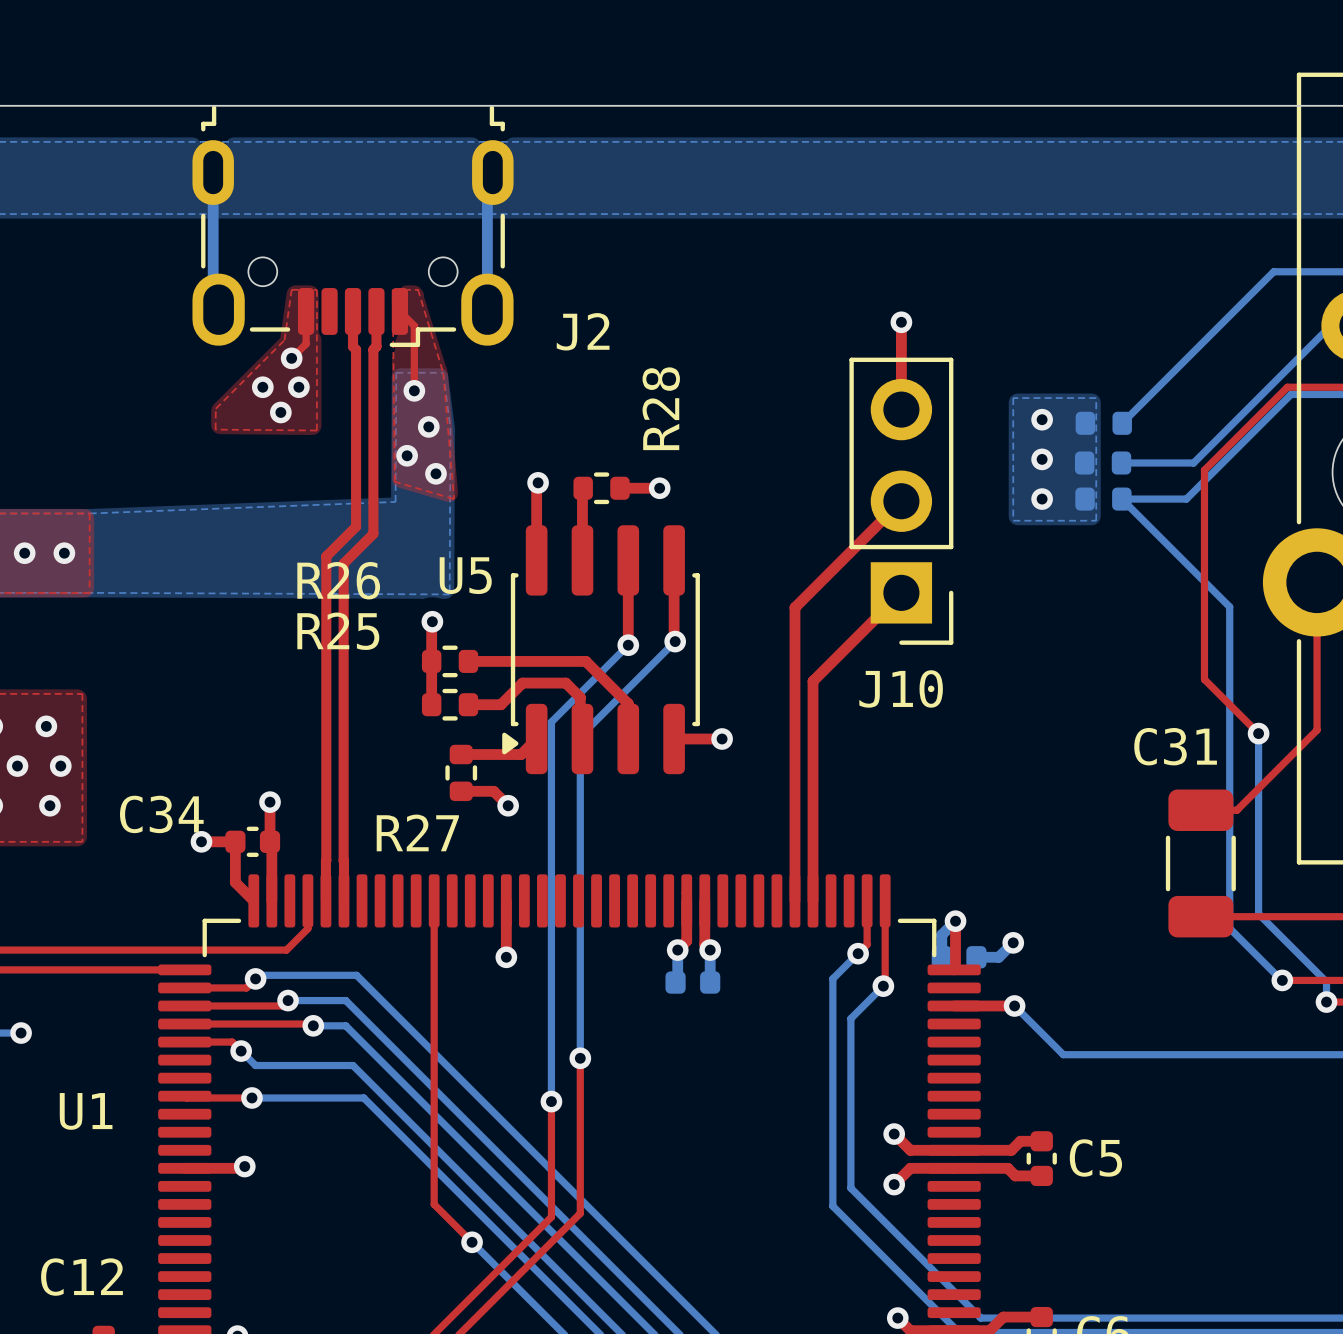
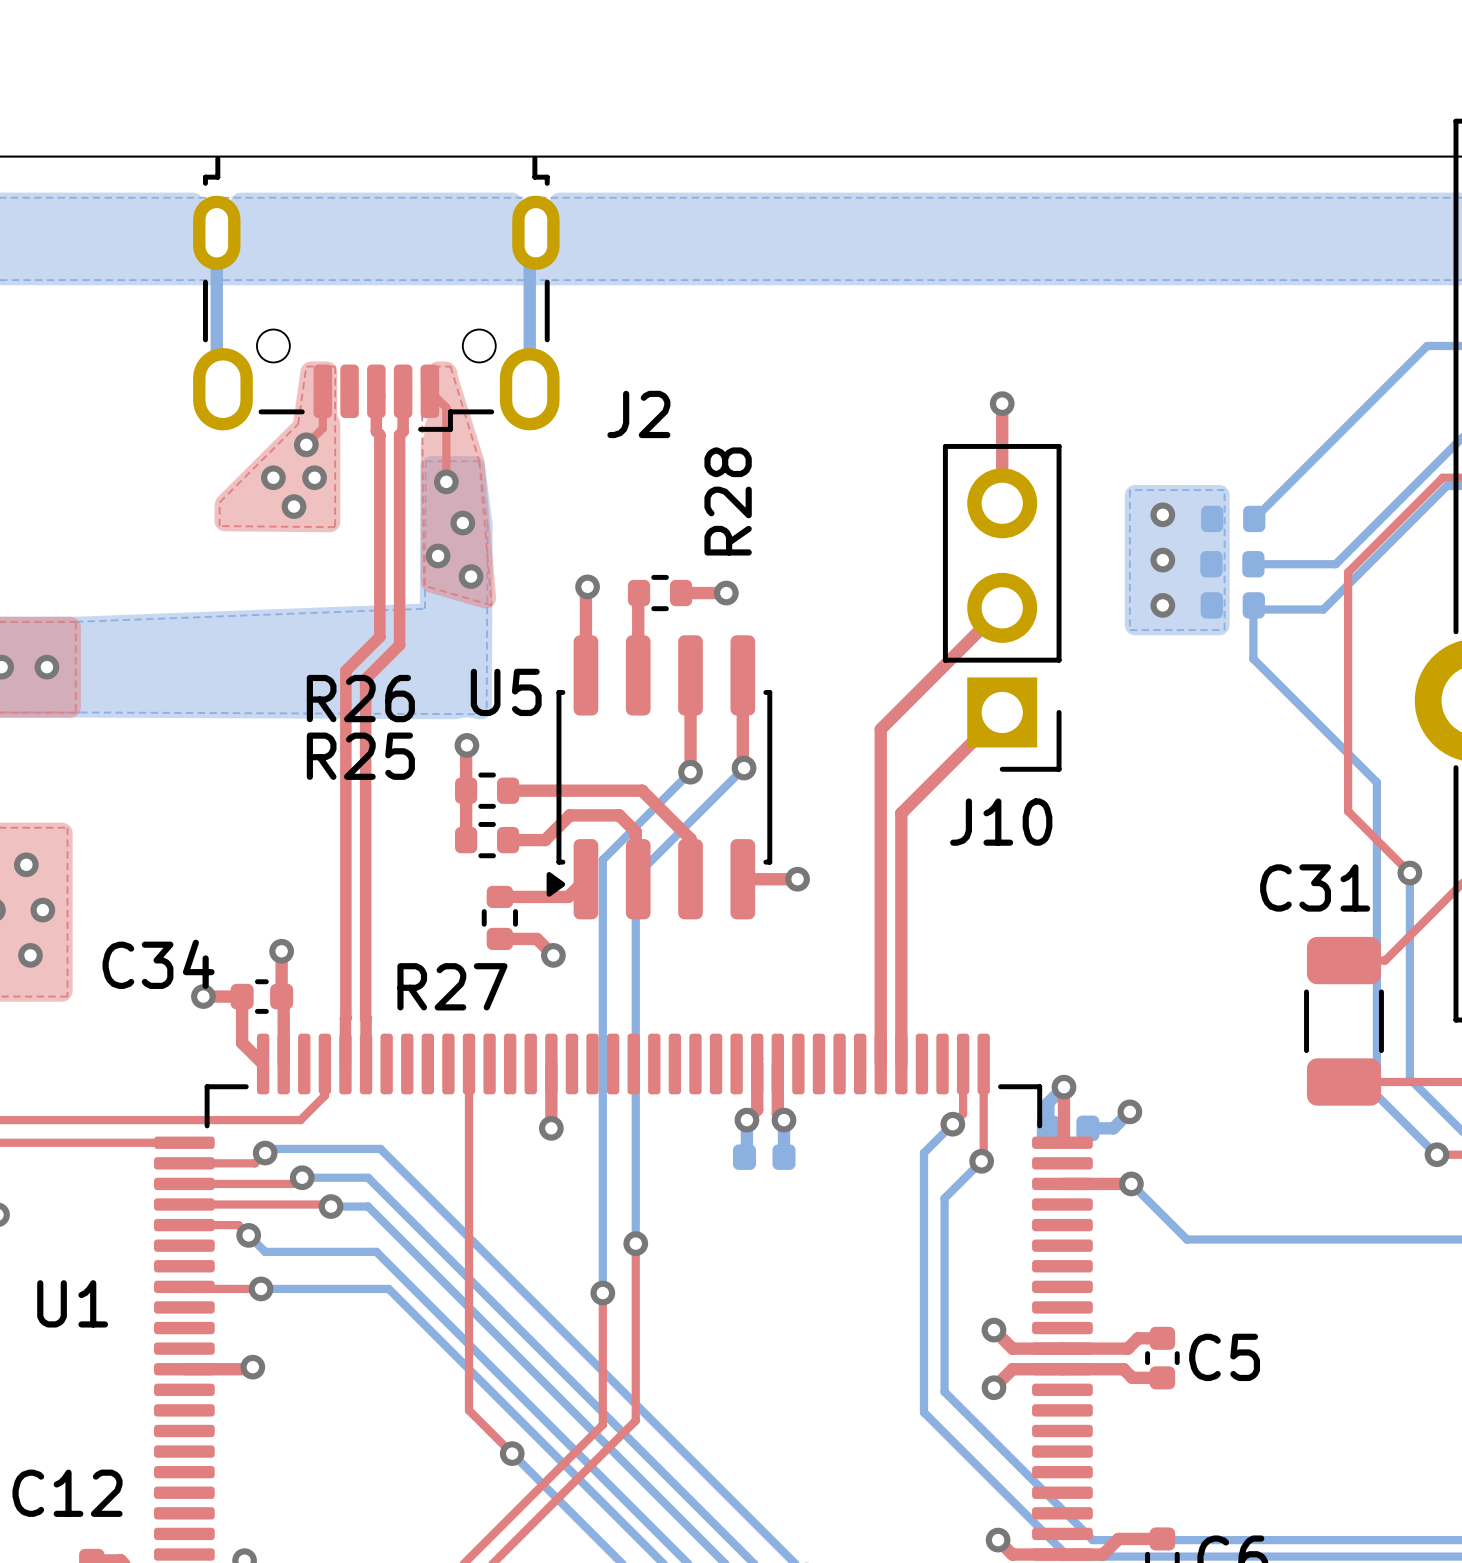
bottom track: (1186, 499) (1121, 499) (1229, 606) (1229, 654) -> (1327, 605) (1323, 609) (1253, 609) (1253, 658) (1376, 782)

